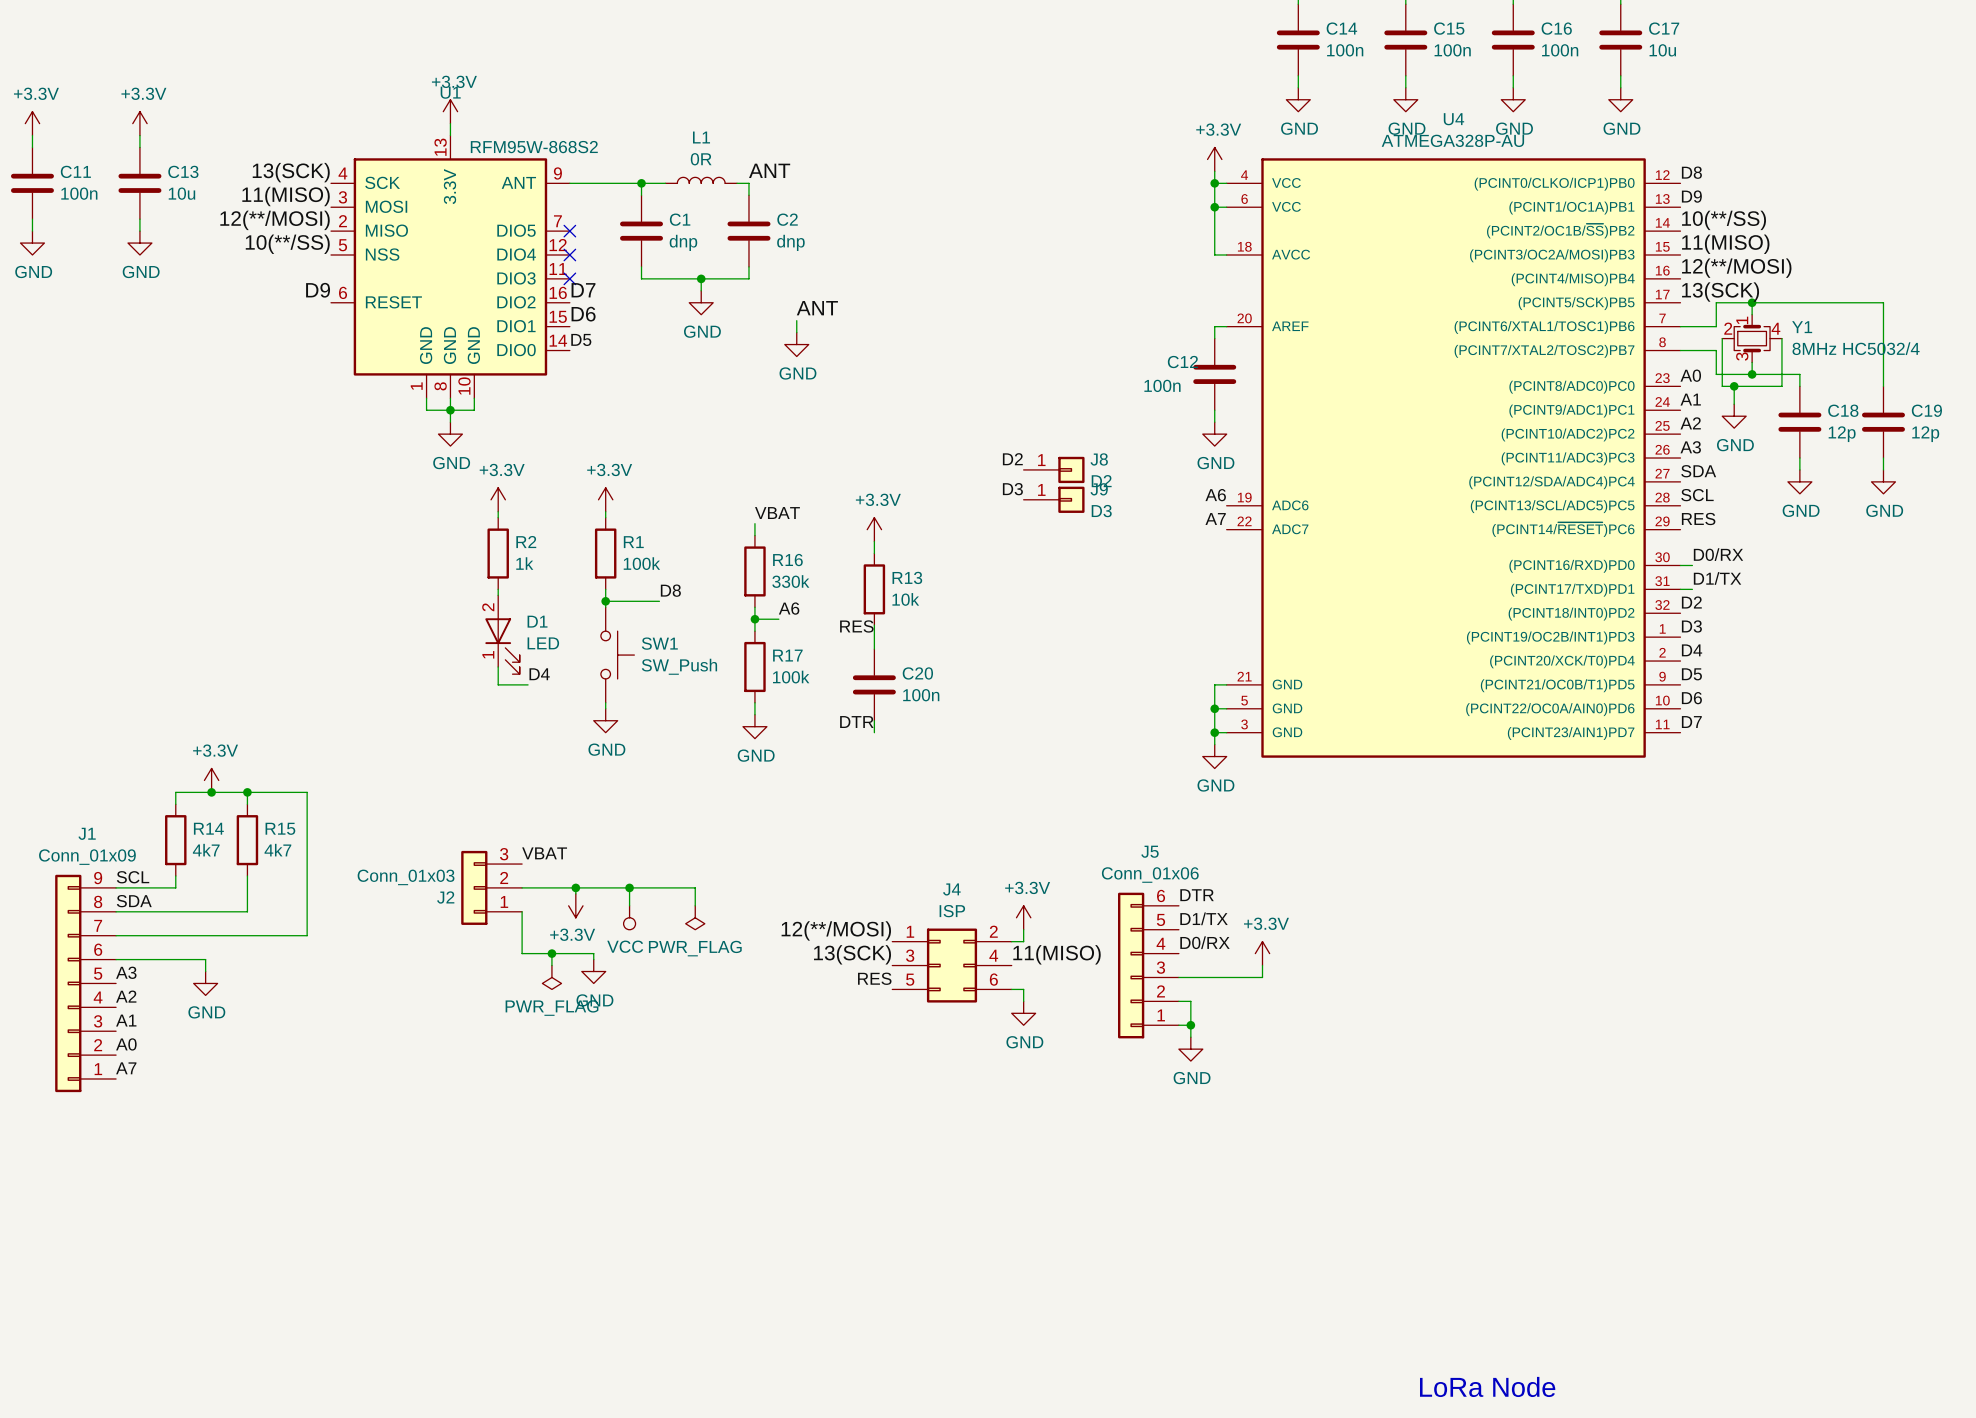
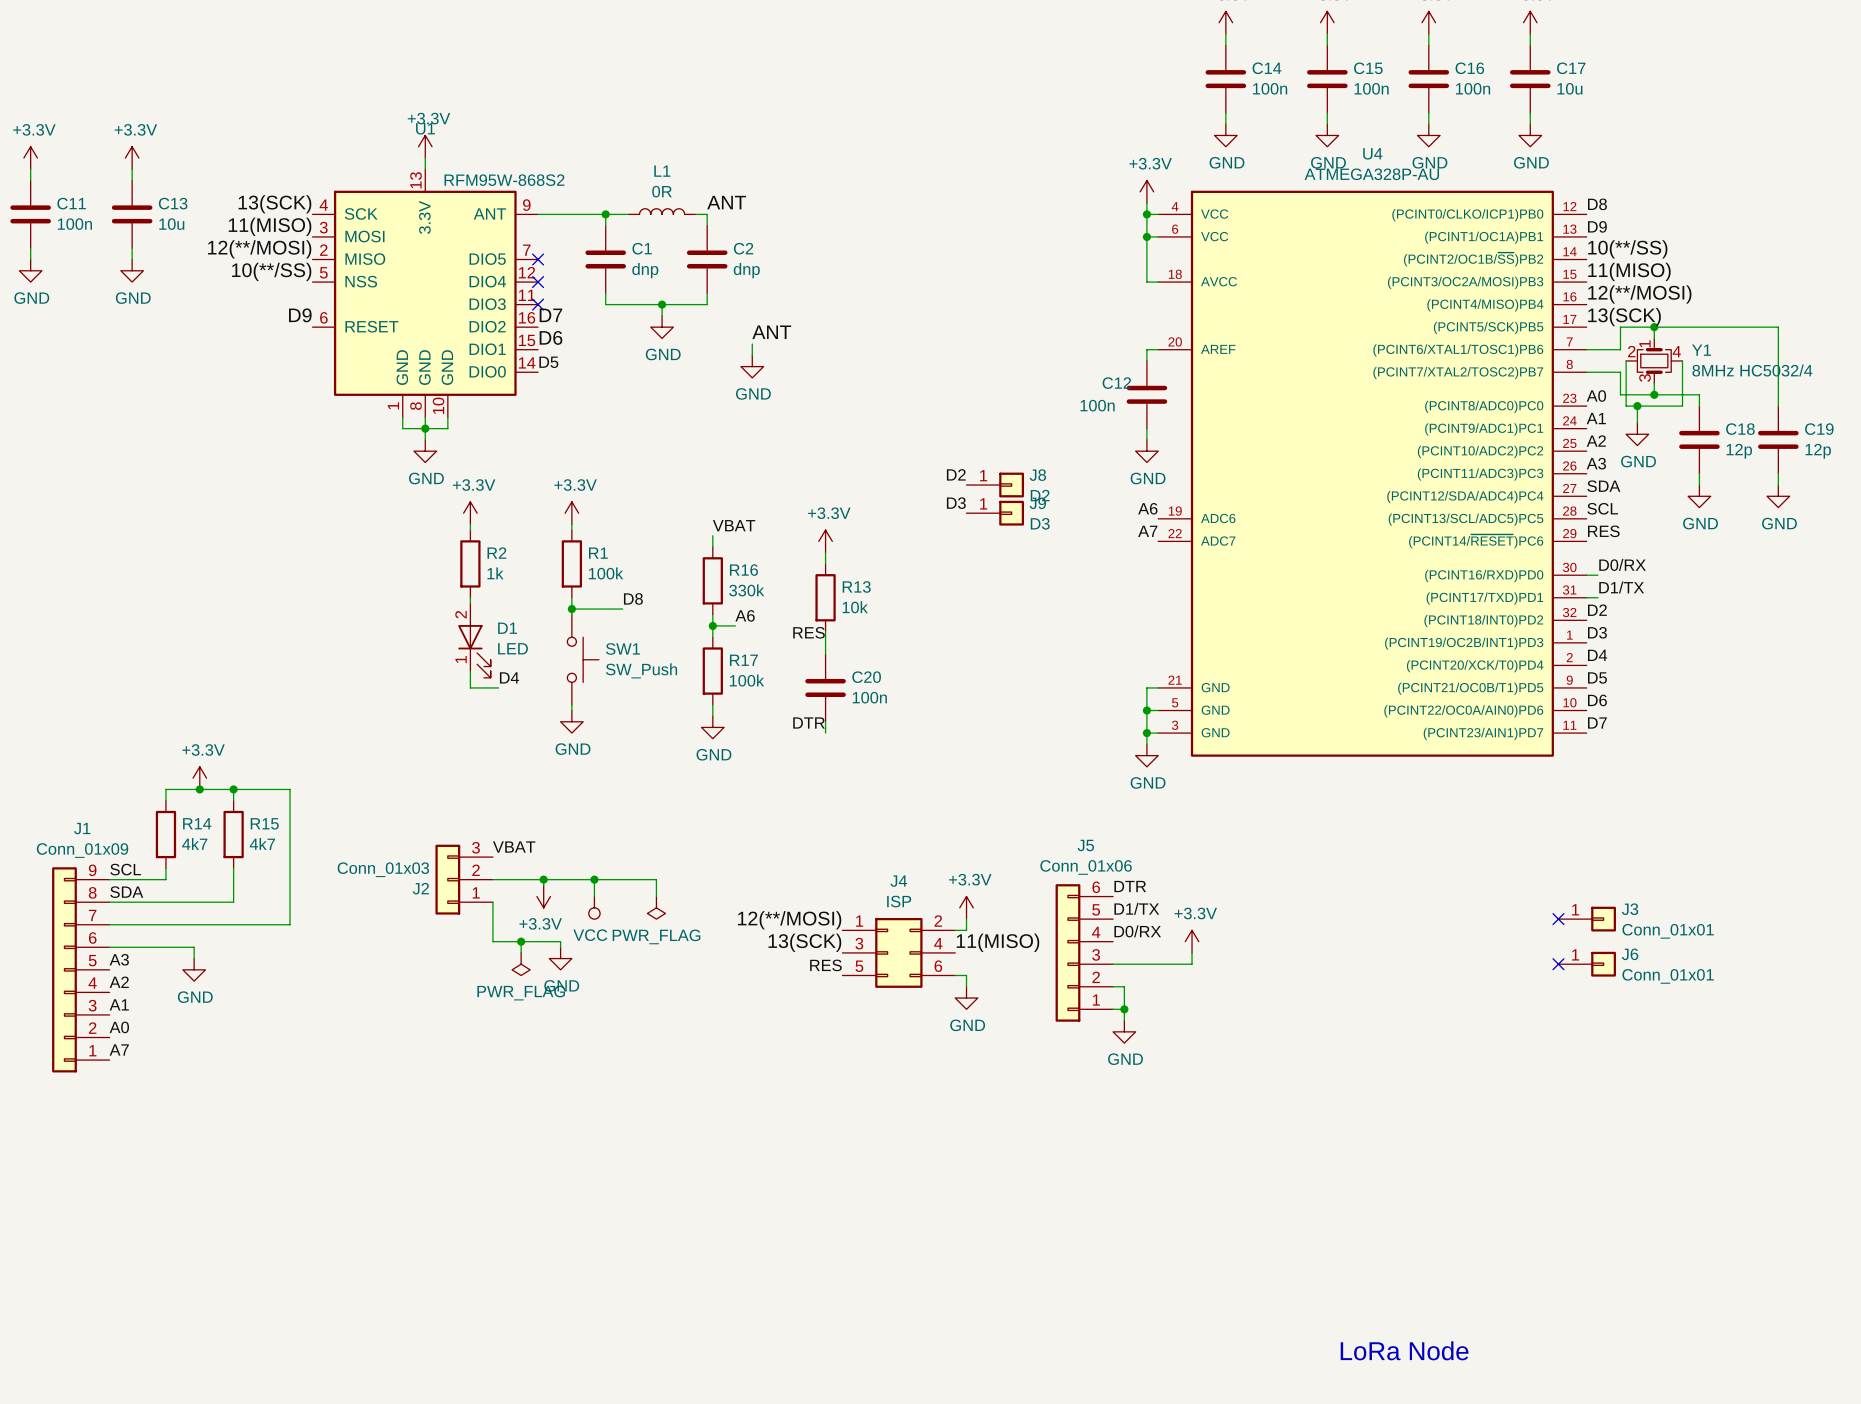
no-connect mark: none -> (1558, 919)
J3: none -> Conn_01x01 (1587, 919)
no-connect mark: none -> (1558, 964)
J6: none -> Conn_01x01 (1587, 964)

